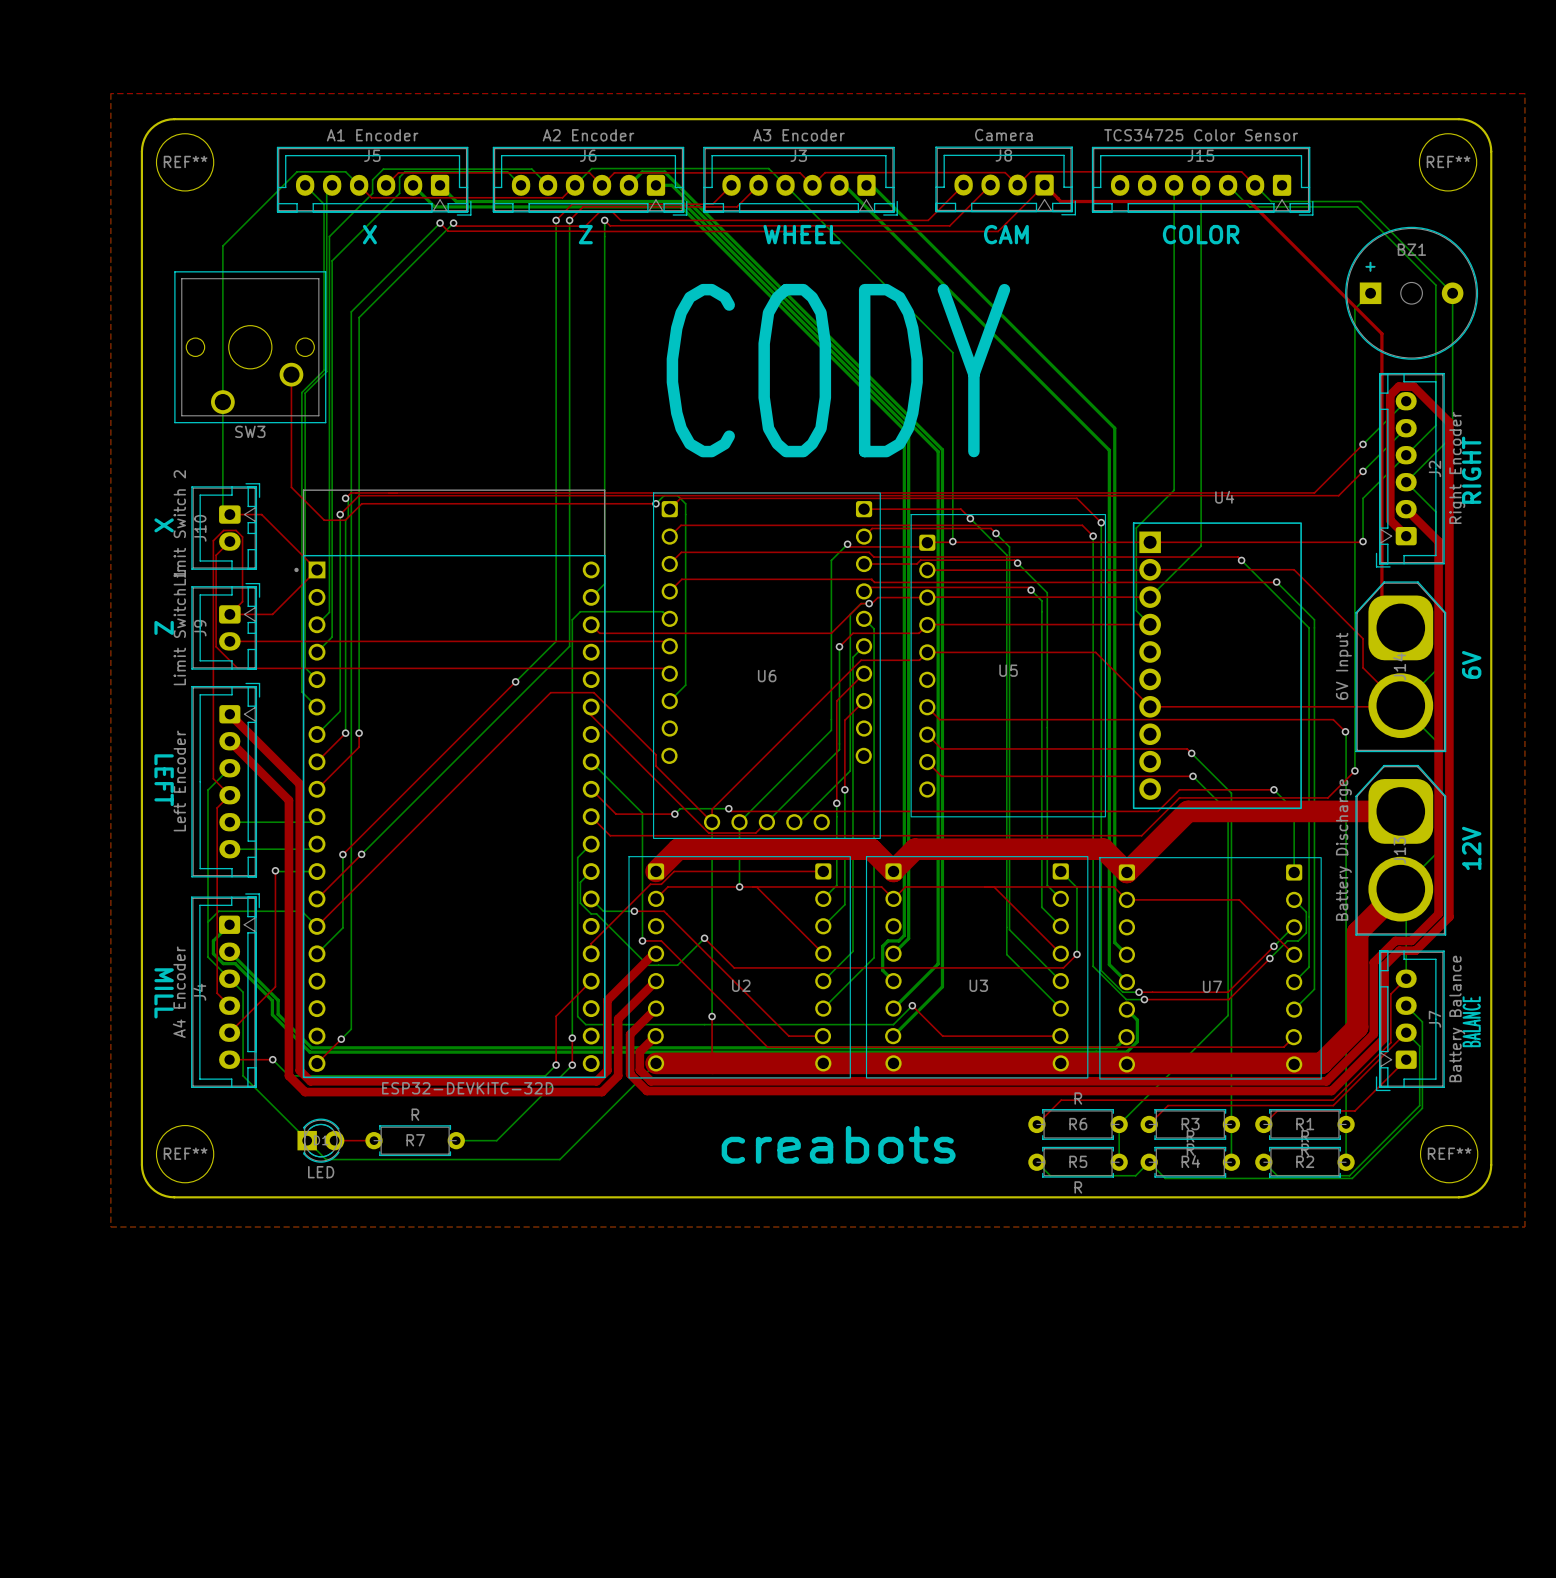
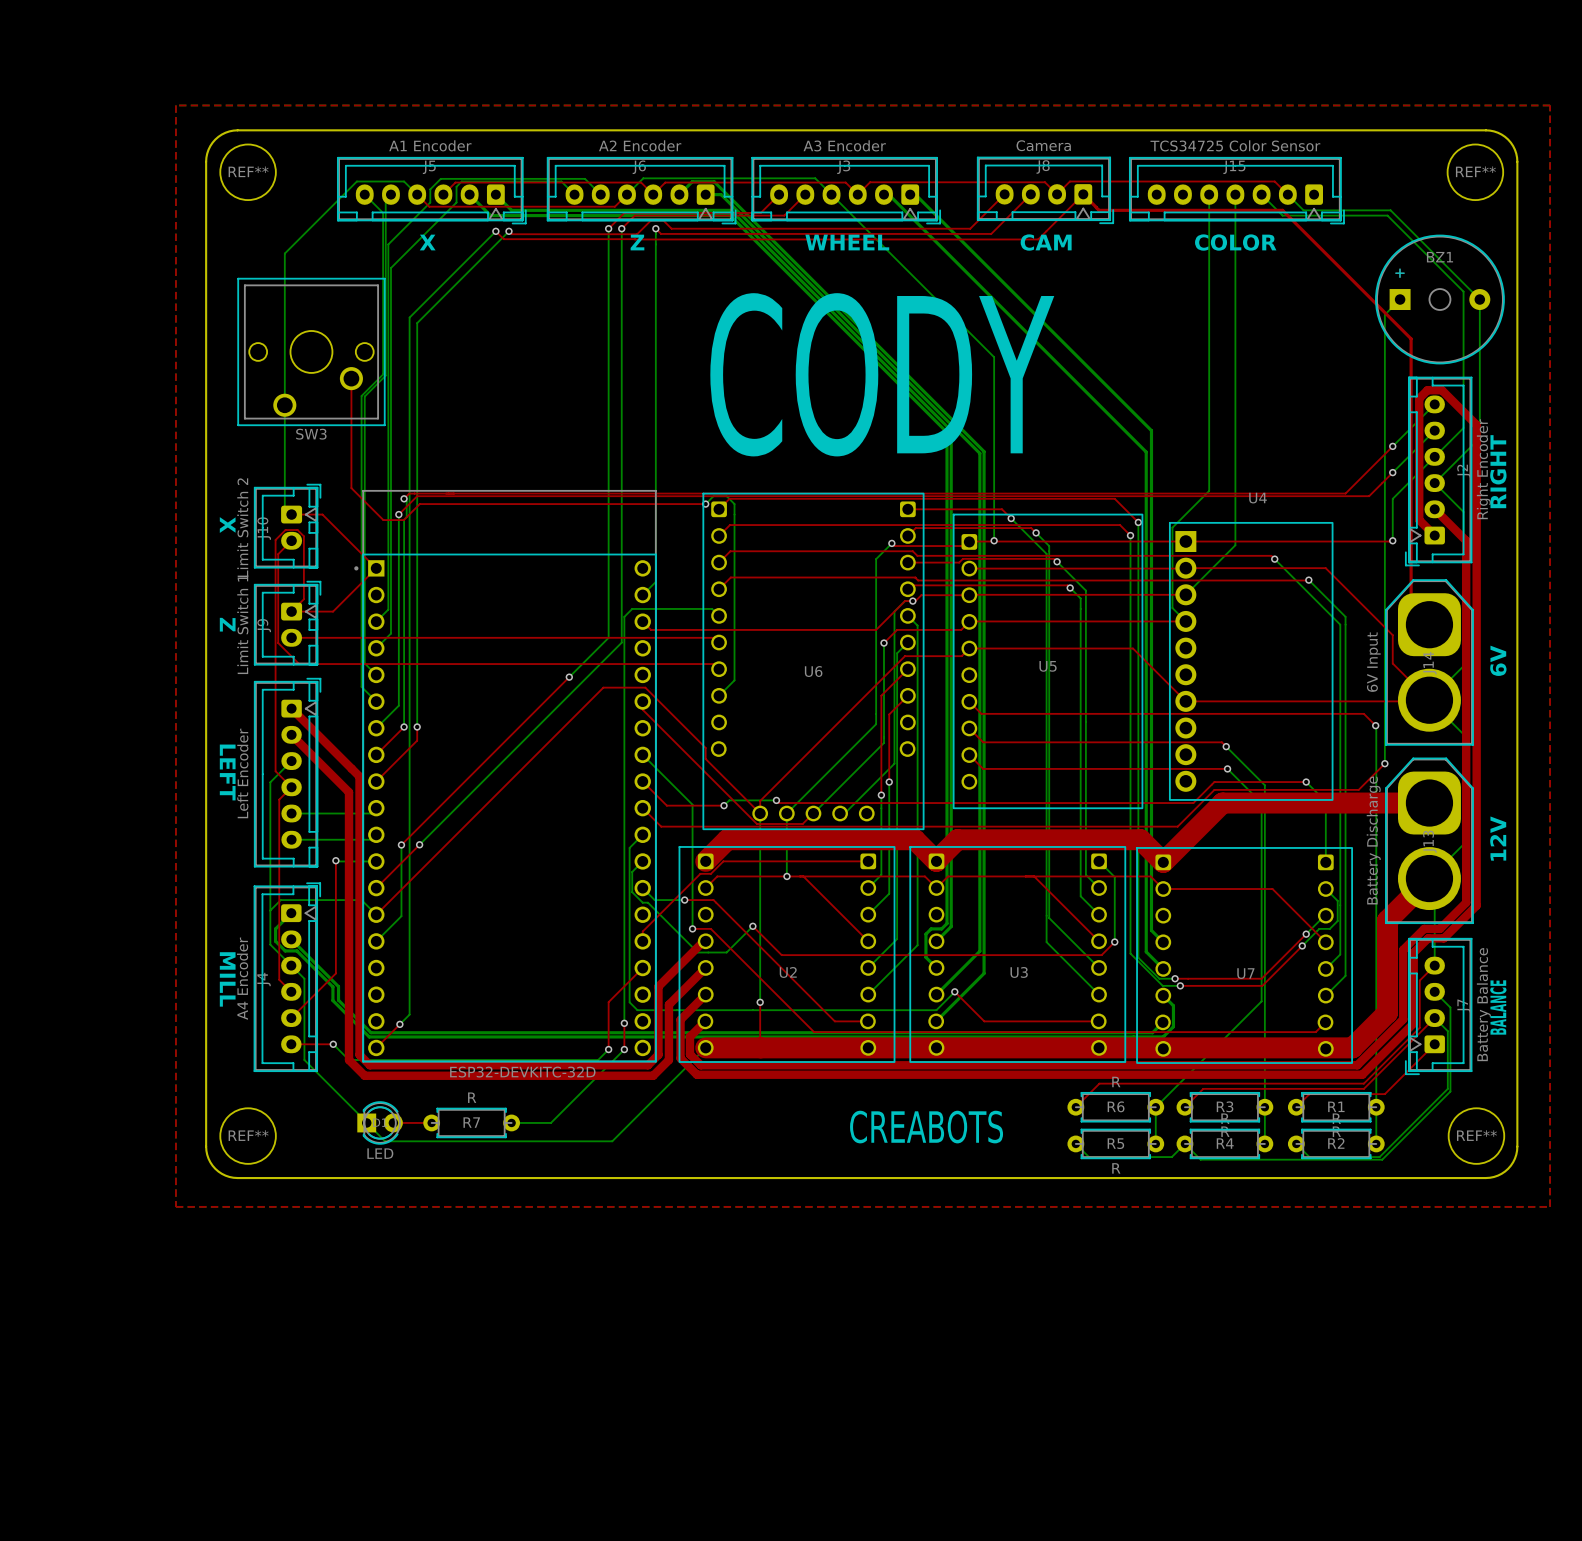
text: creabots (838, 1144) -> CREABOTS (926, 1127)

